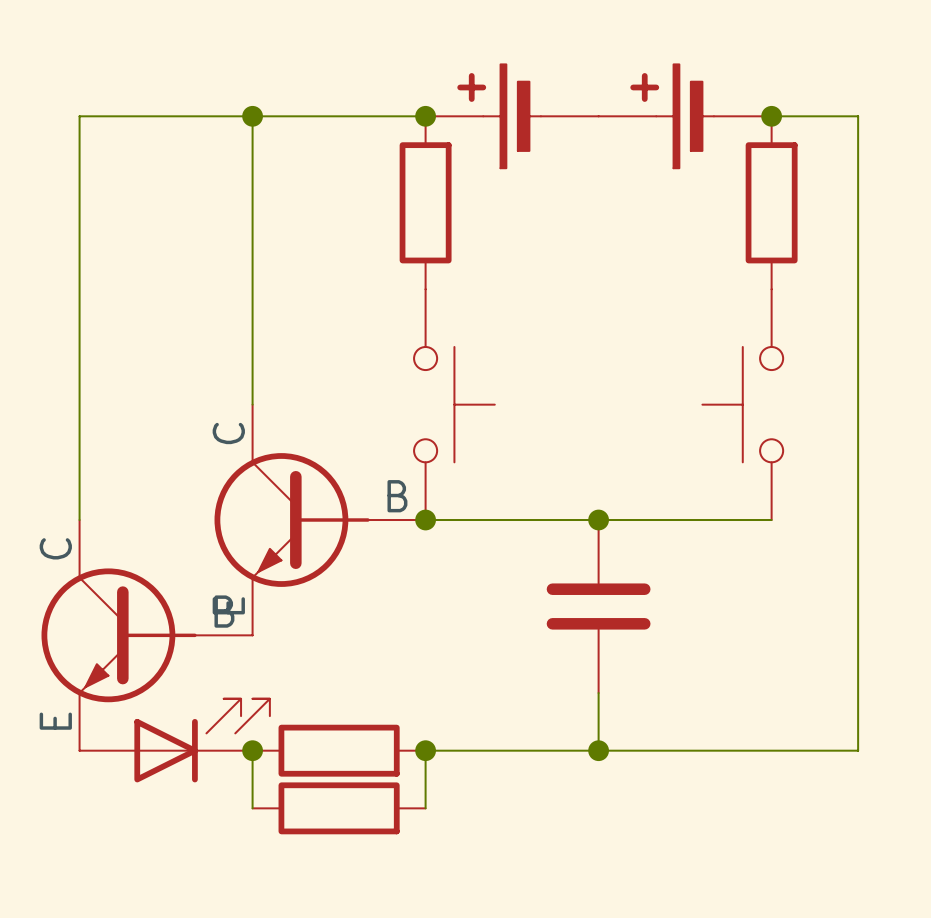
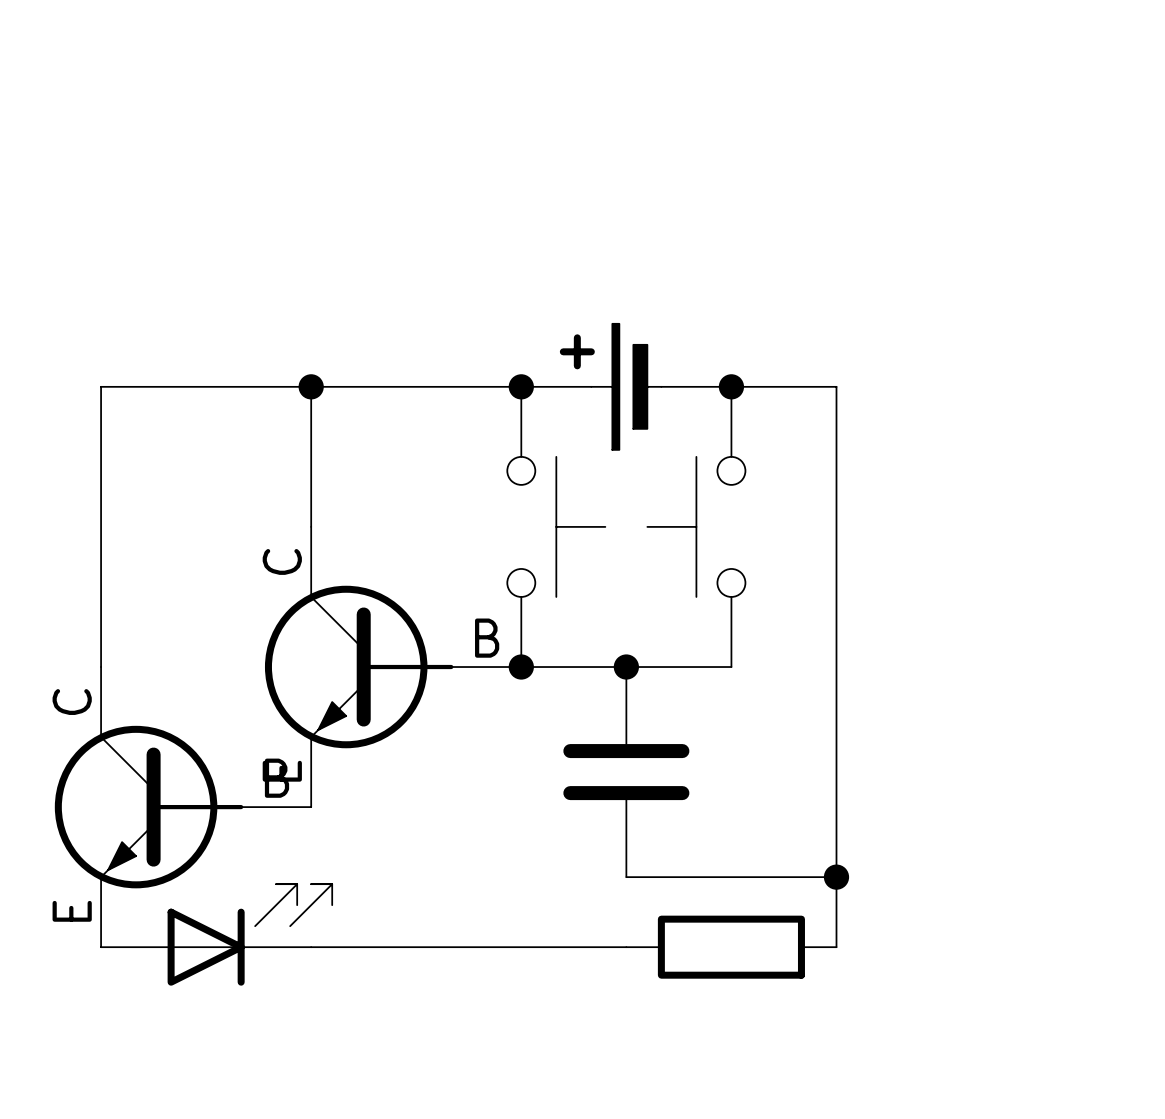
wire: (252, 116) (252, 289) -> none
junction: (252, 116) -> none
wire: (425, 116) (79, 116) (79, 289) -> (521, 386) (101, 386)
junction: (425, 116) -> none
part: (512, 116) -> none
part: (685, 116) -> none
wire: (771, 116) (858, 116) (858, 750) (512, 750) -> none
junction: (771, 116) -> none
part: (425, 202) -> none
part: (771, 202) -> none
junction: none -> (311, 386)
junction: none -> (521, 386)
part: none -> (626, 386)
wire: none -> (731, 386) (836, 386) (836, 947)
junction: none -> (731, 386)
part position: (742, 404) -> (696, 526)
wire: (598, 520) (771, 520) -> (626, 877) (836, 877)
junction position: (598, 520) -> (626, 667)
part position: (598, 606) -> (626, 772)
wire: (598, 693) (598, 750) -> none
junction: none -> (836, 877)
wire: (252, 750) (252, 808) -> (311, 947) (521, 947)
junction: (252, 750) -> none
part: (339, 750) -> none
wire: (425, 750) (425, 808) -> none
junction: (425, 750) -> none
junction: (598, 750) -> none
part: none -> (731, 947)
part: (339, 808) -> none

